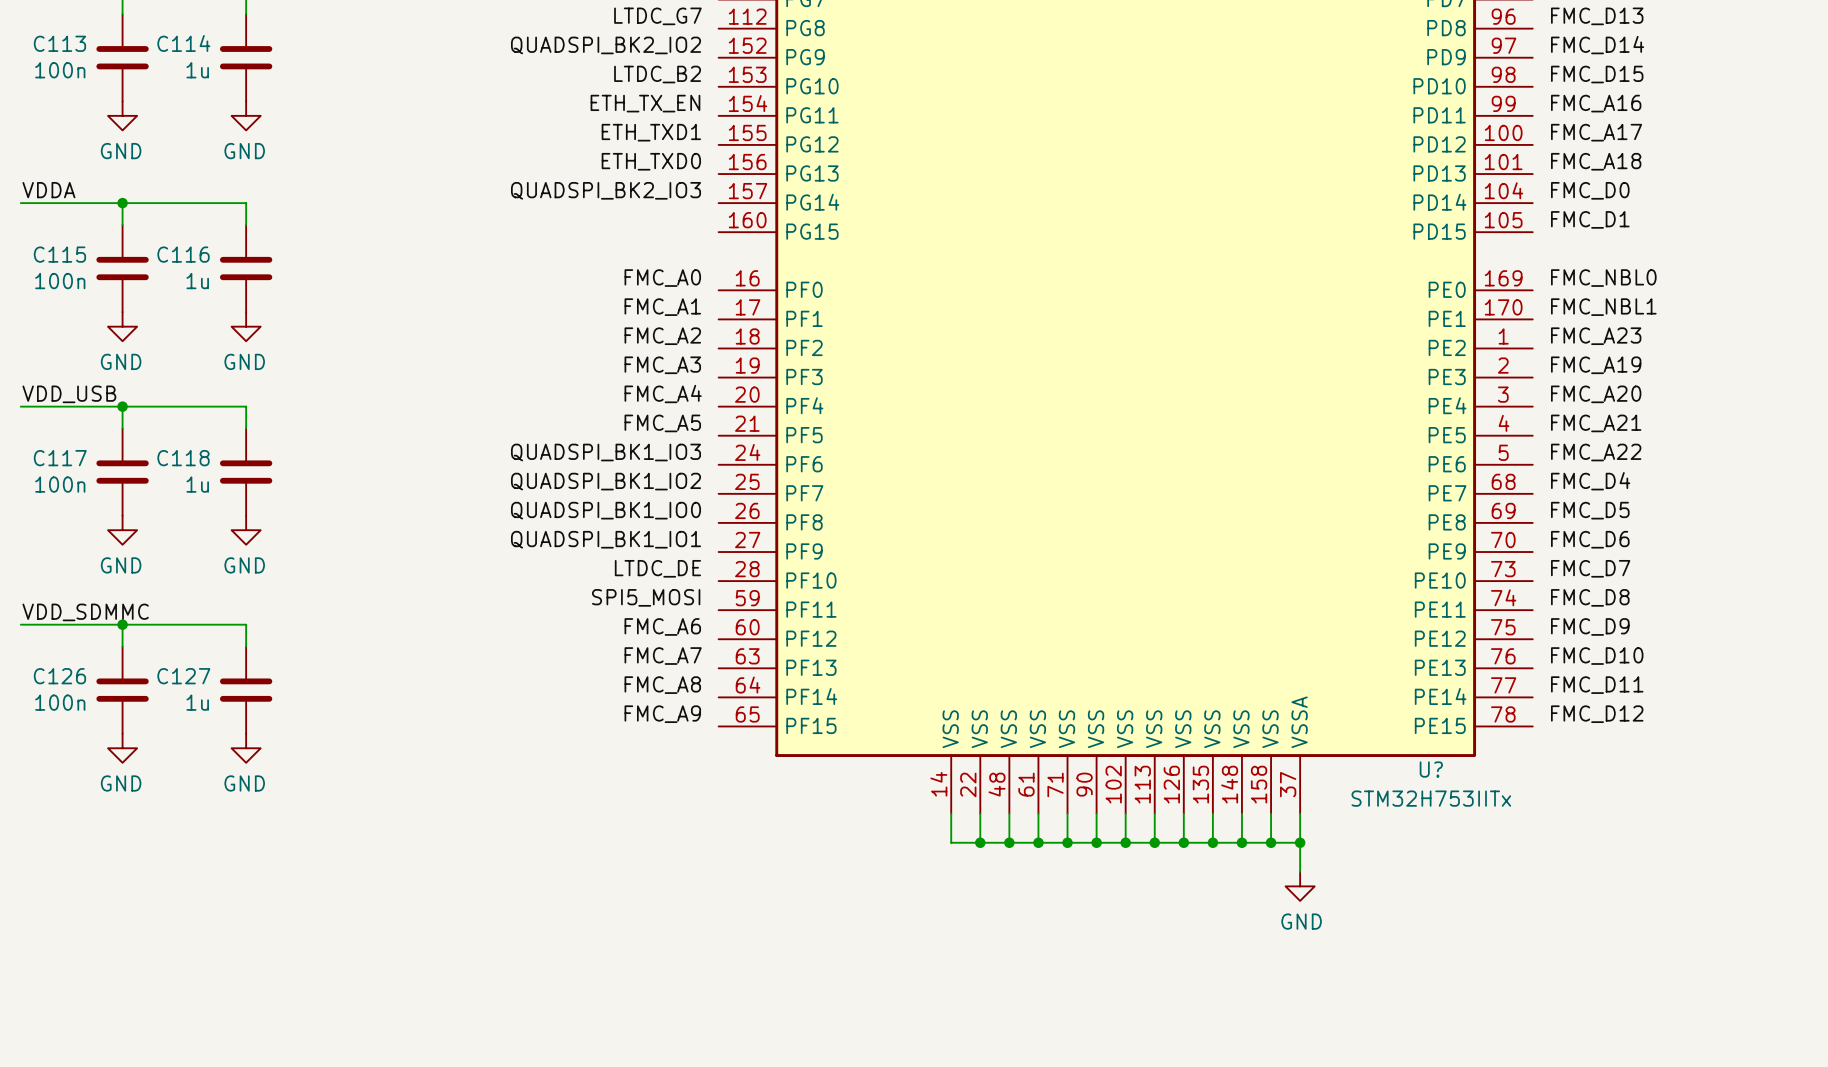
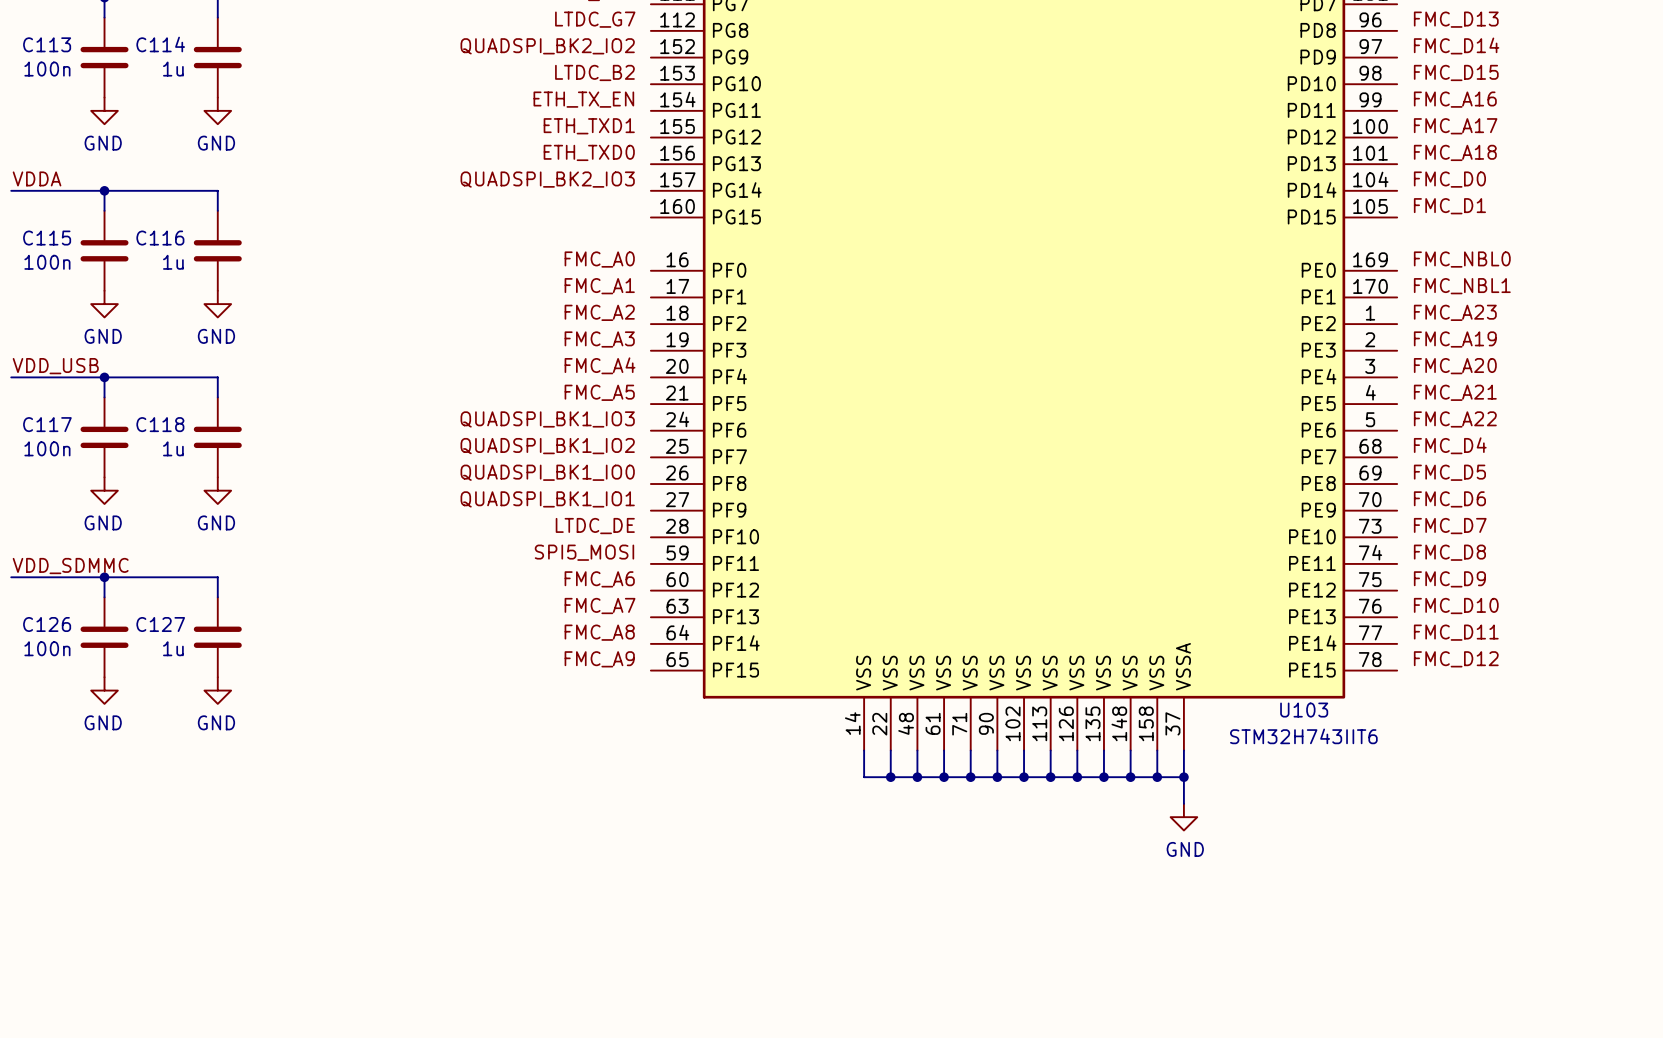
U? name: U? (1431, 769) -> U103 (1304, 710)
U? value: STM32H753IITx (1431, 798) -> STM32H743IIT6 (1303, 736)

